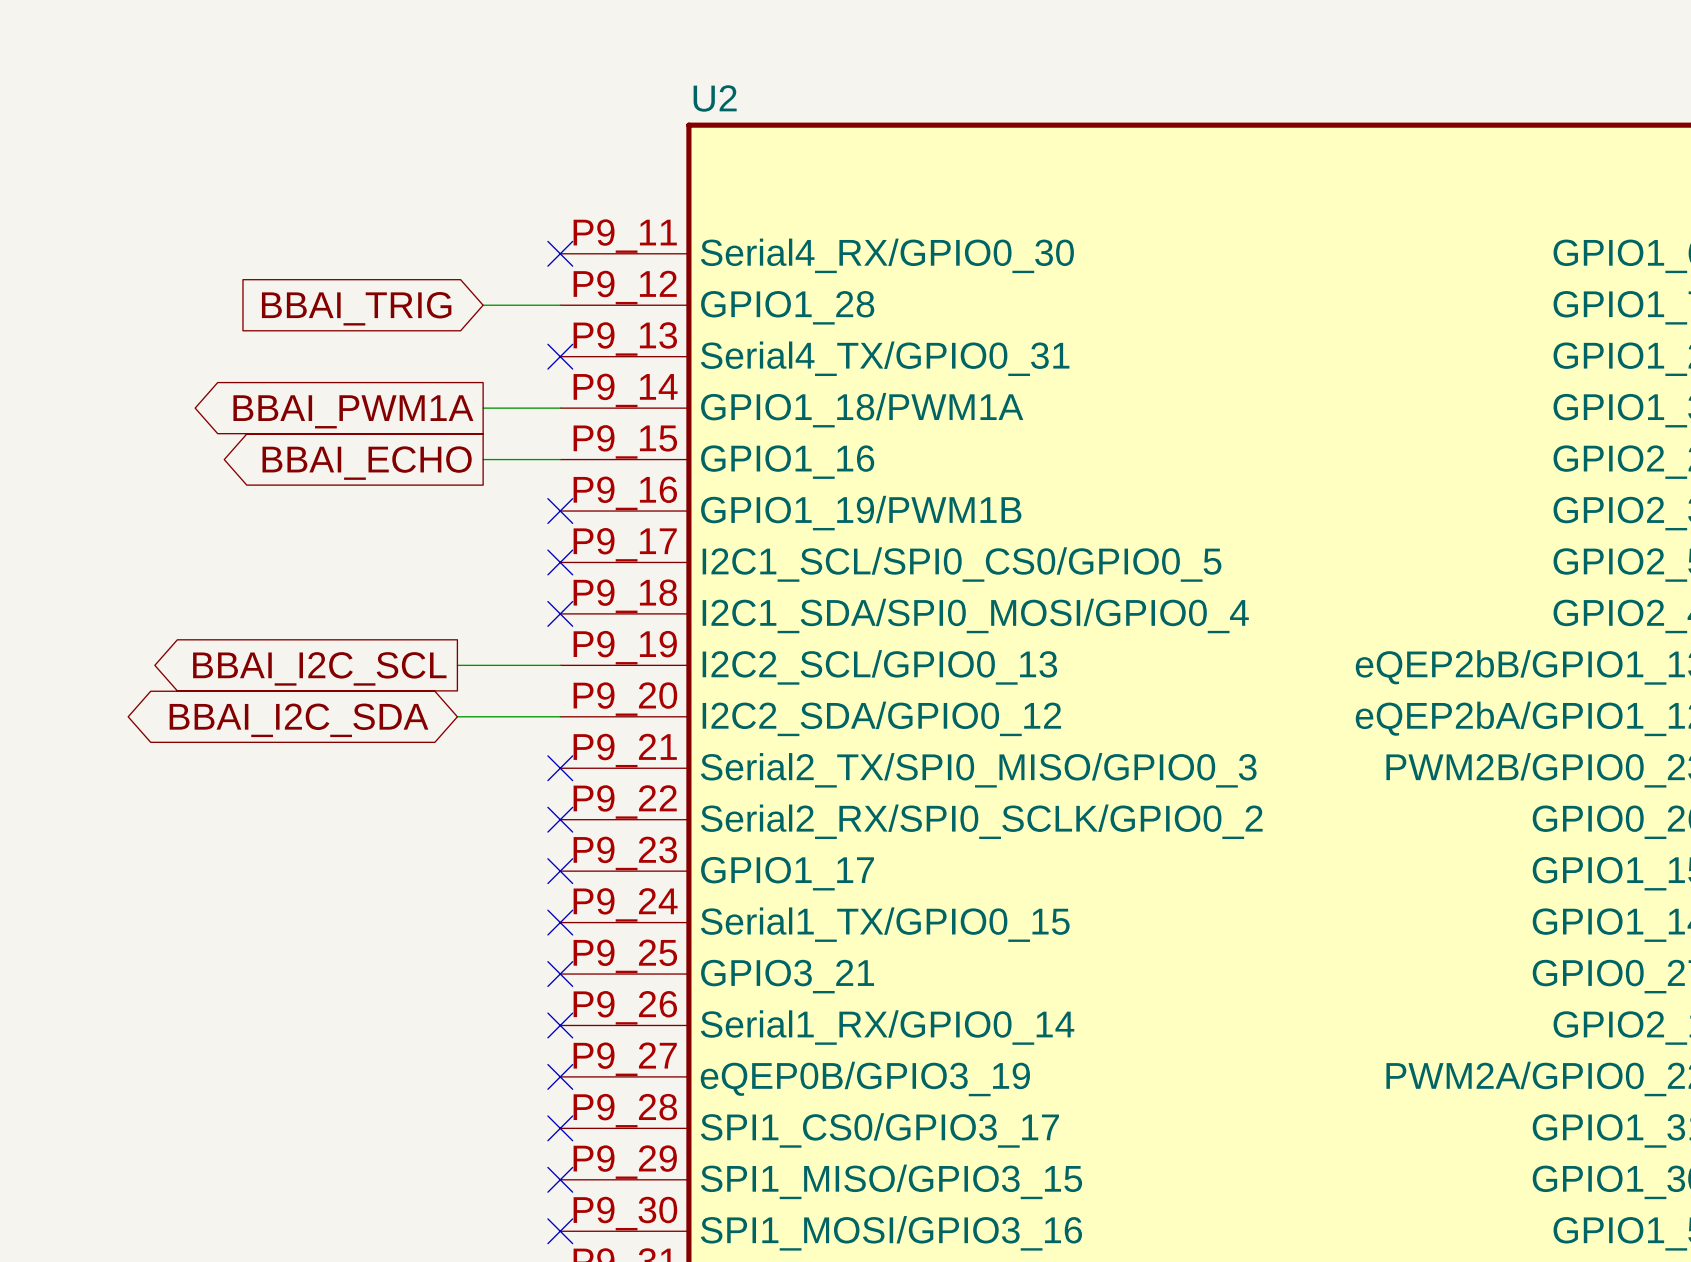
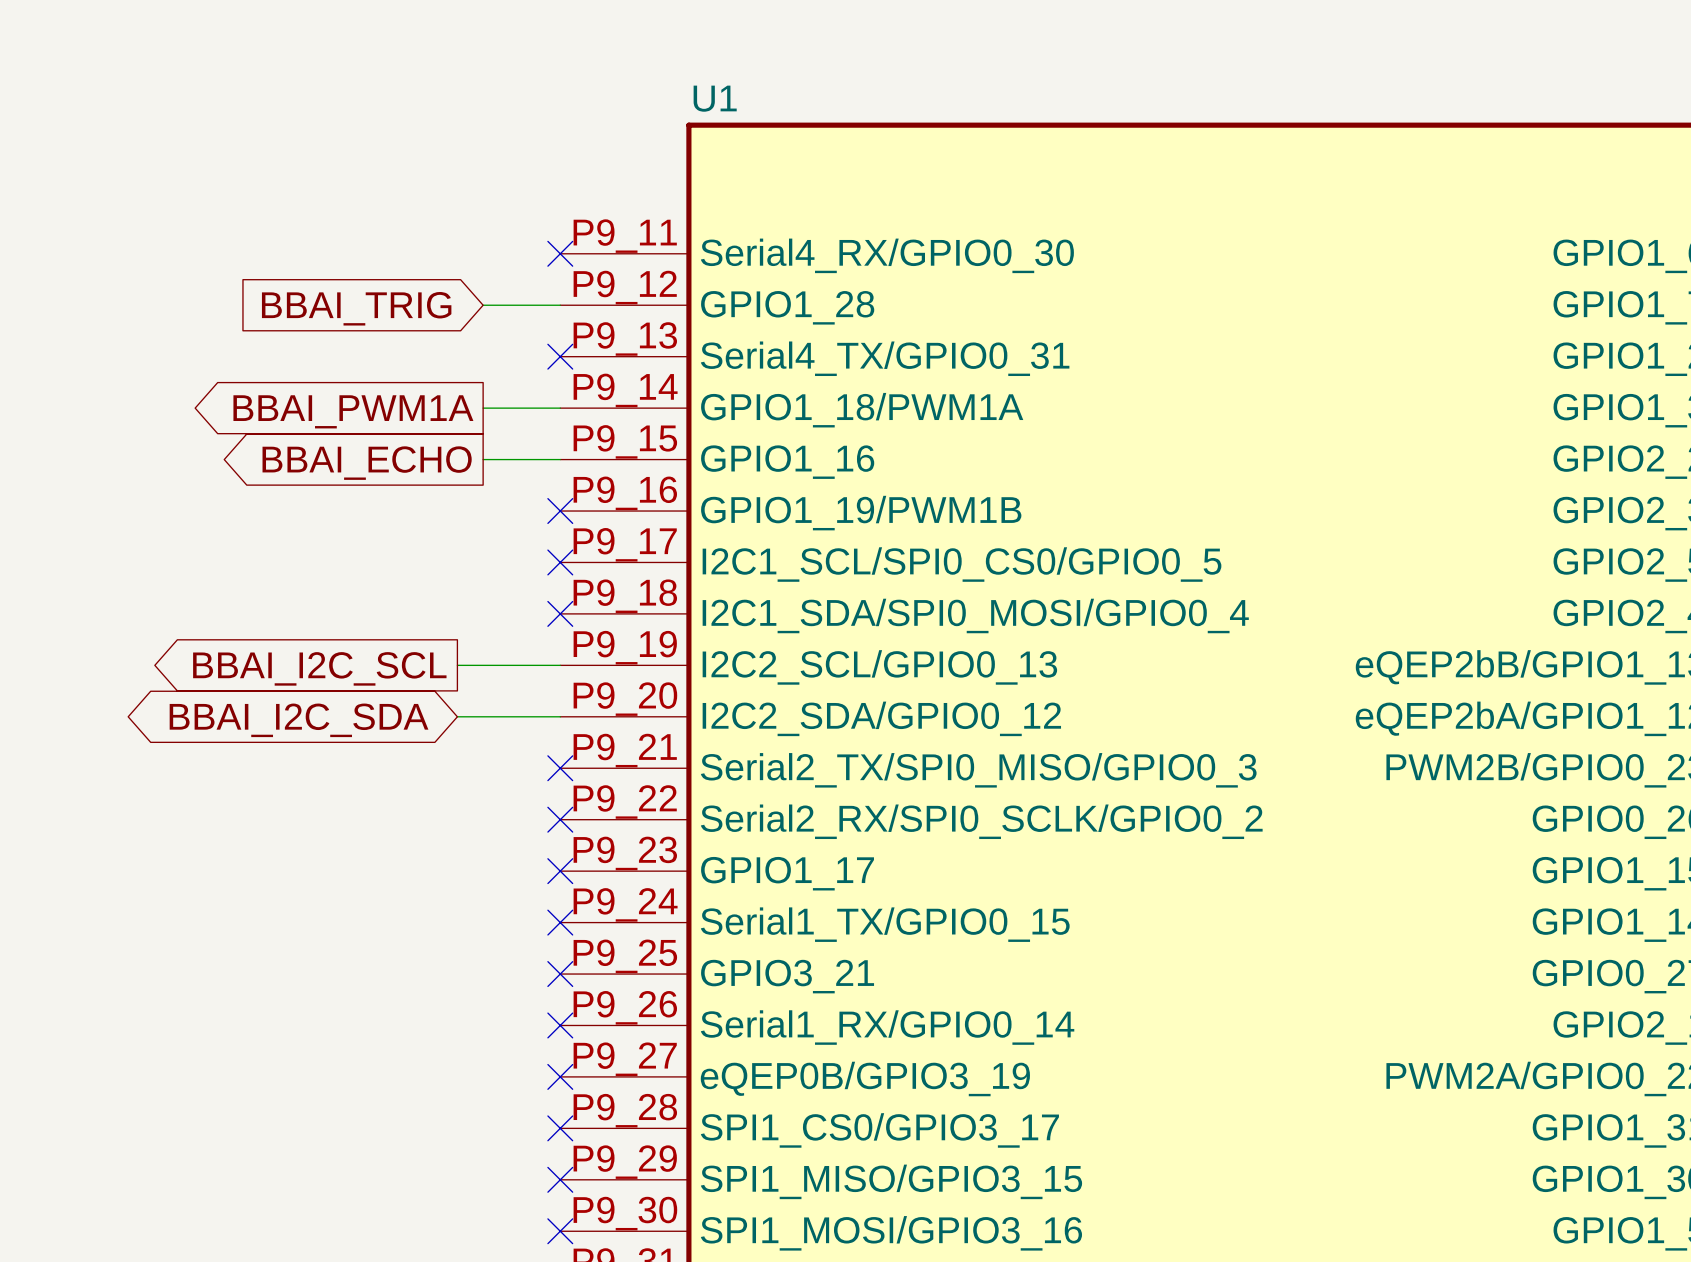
U2 name: U2 (715, 98) -> U1 (715, 98)

